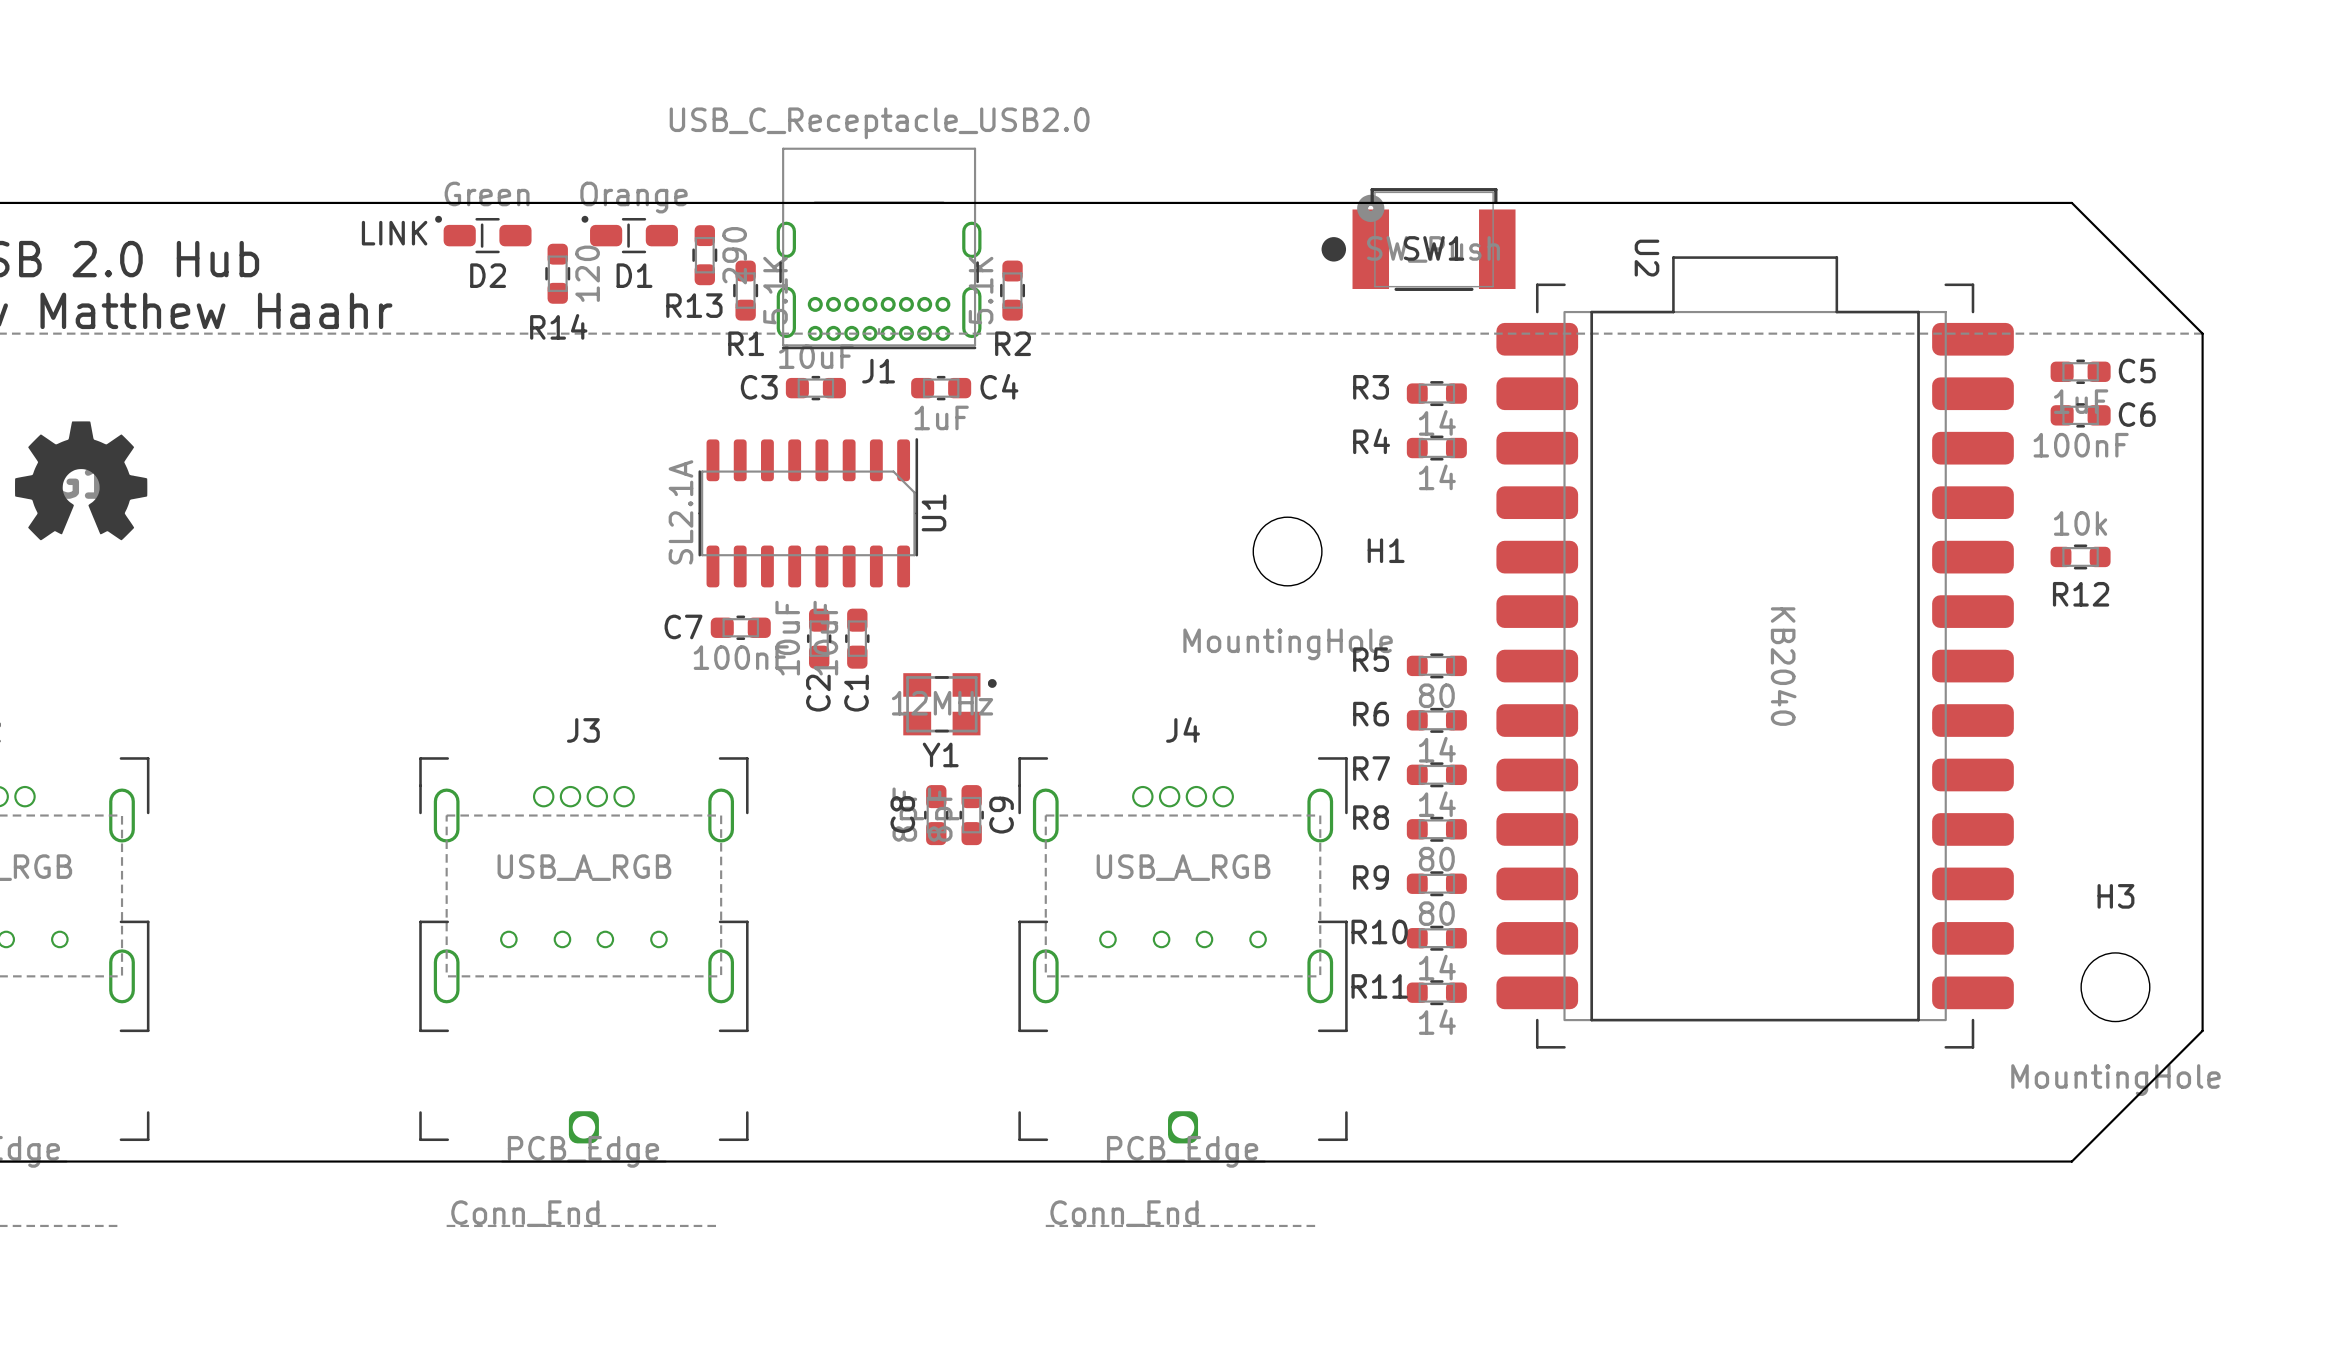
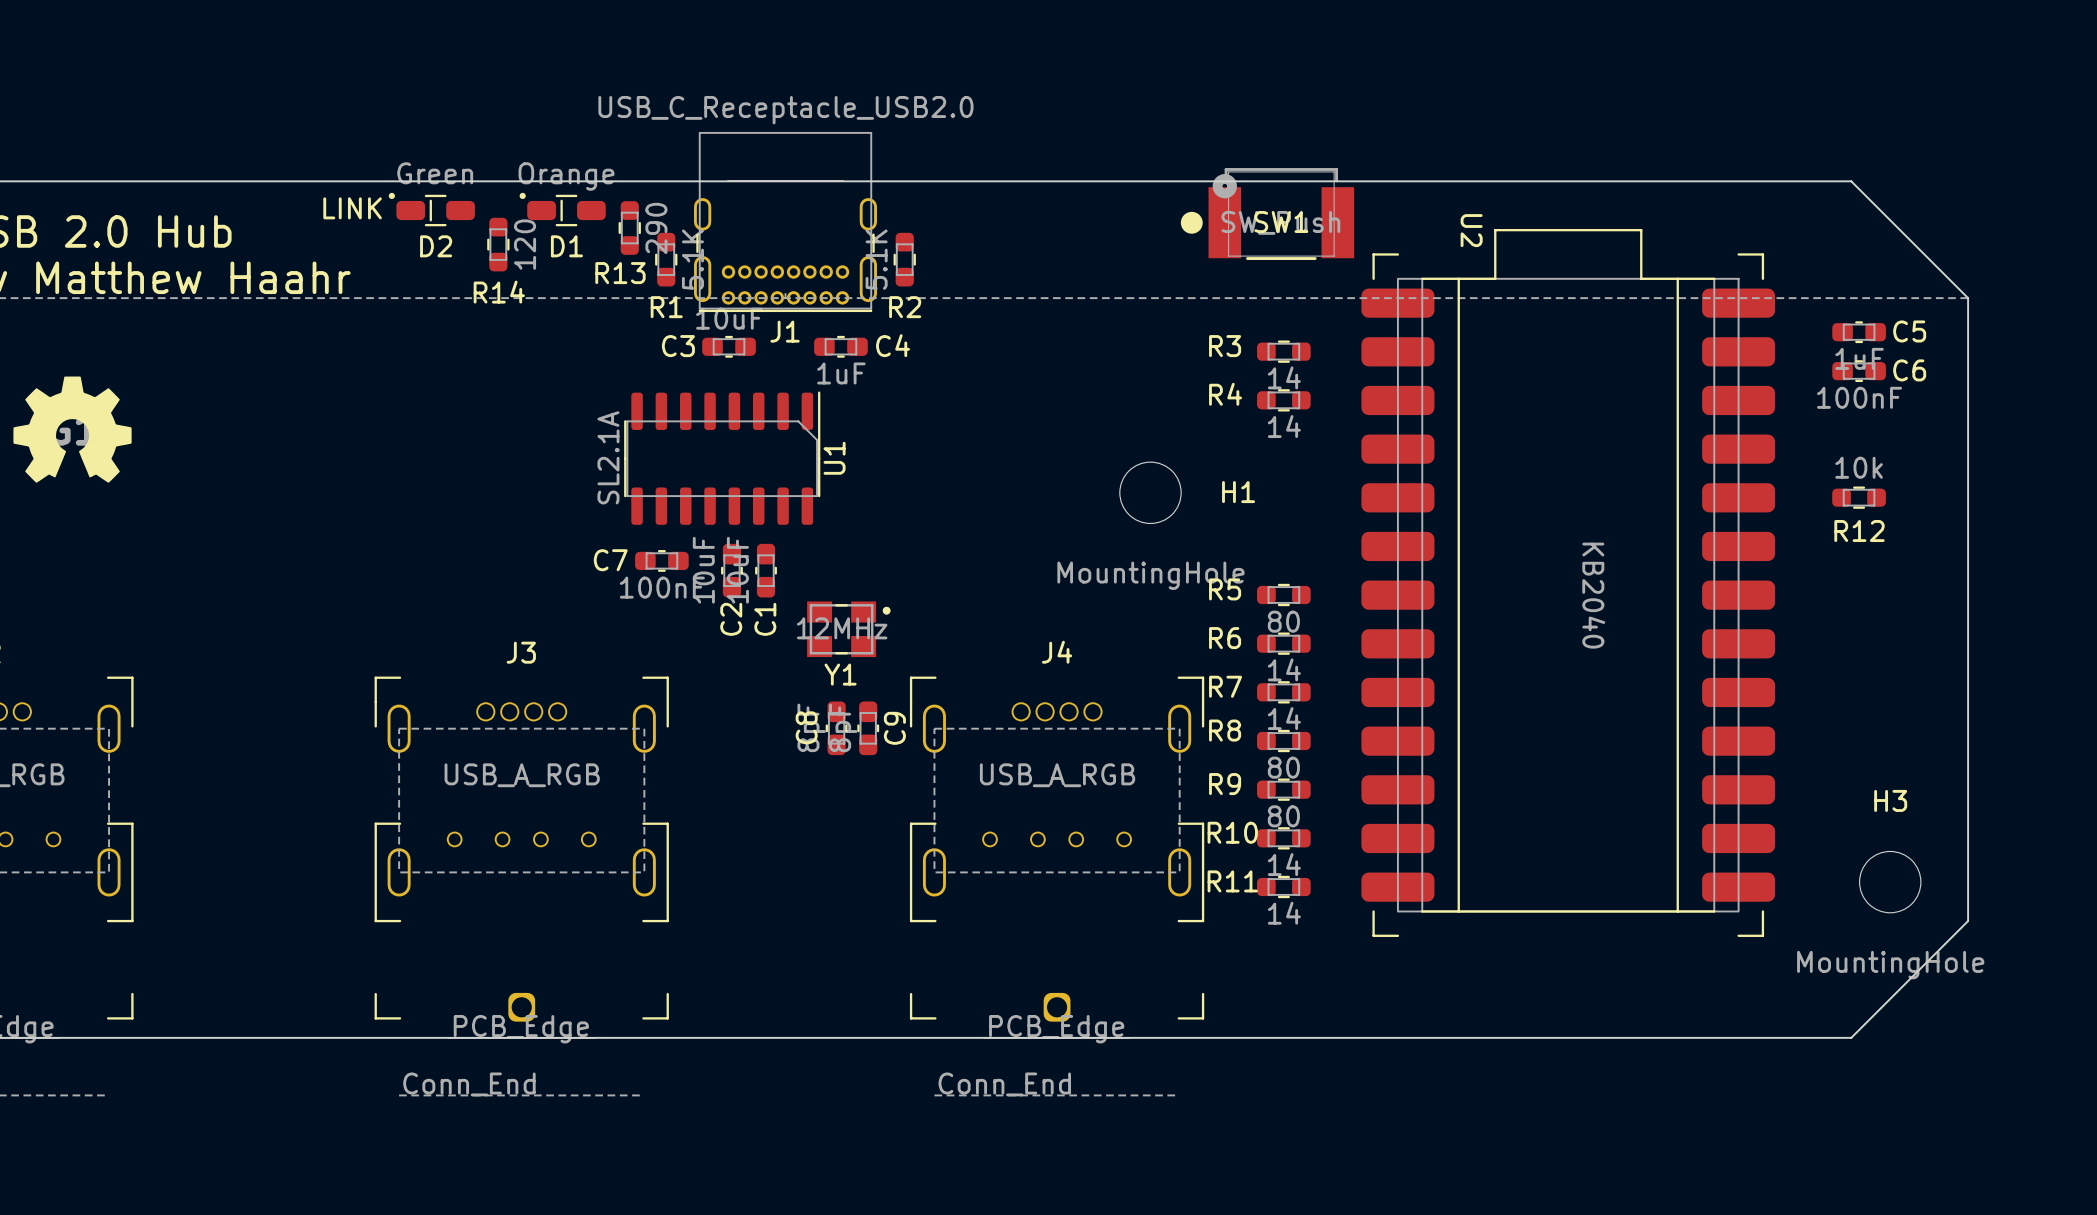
SW1 footprint: [1321, 188, 1516, 291] -> [1180, 168, 1355, 261]
U2 footprint: [1496, 256, 2014, 1049] -> [1361, 229, 1776, 937]

